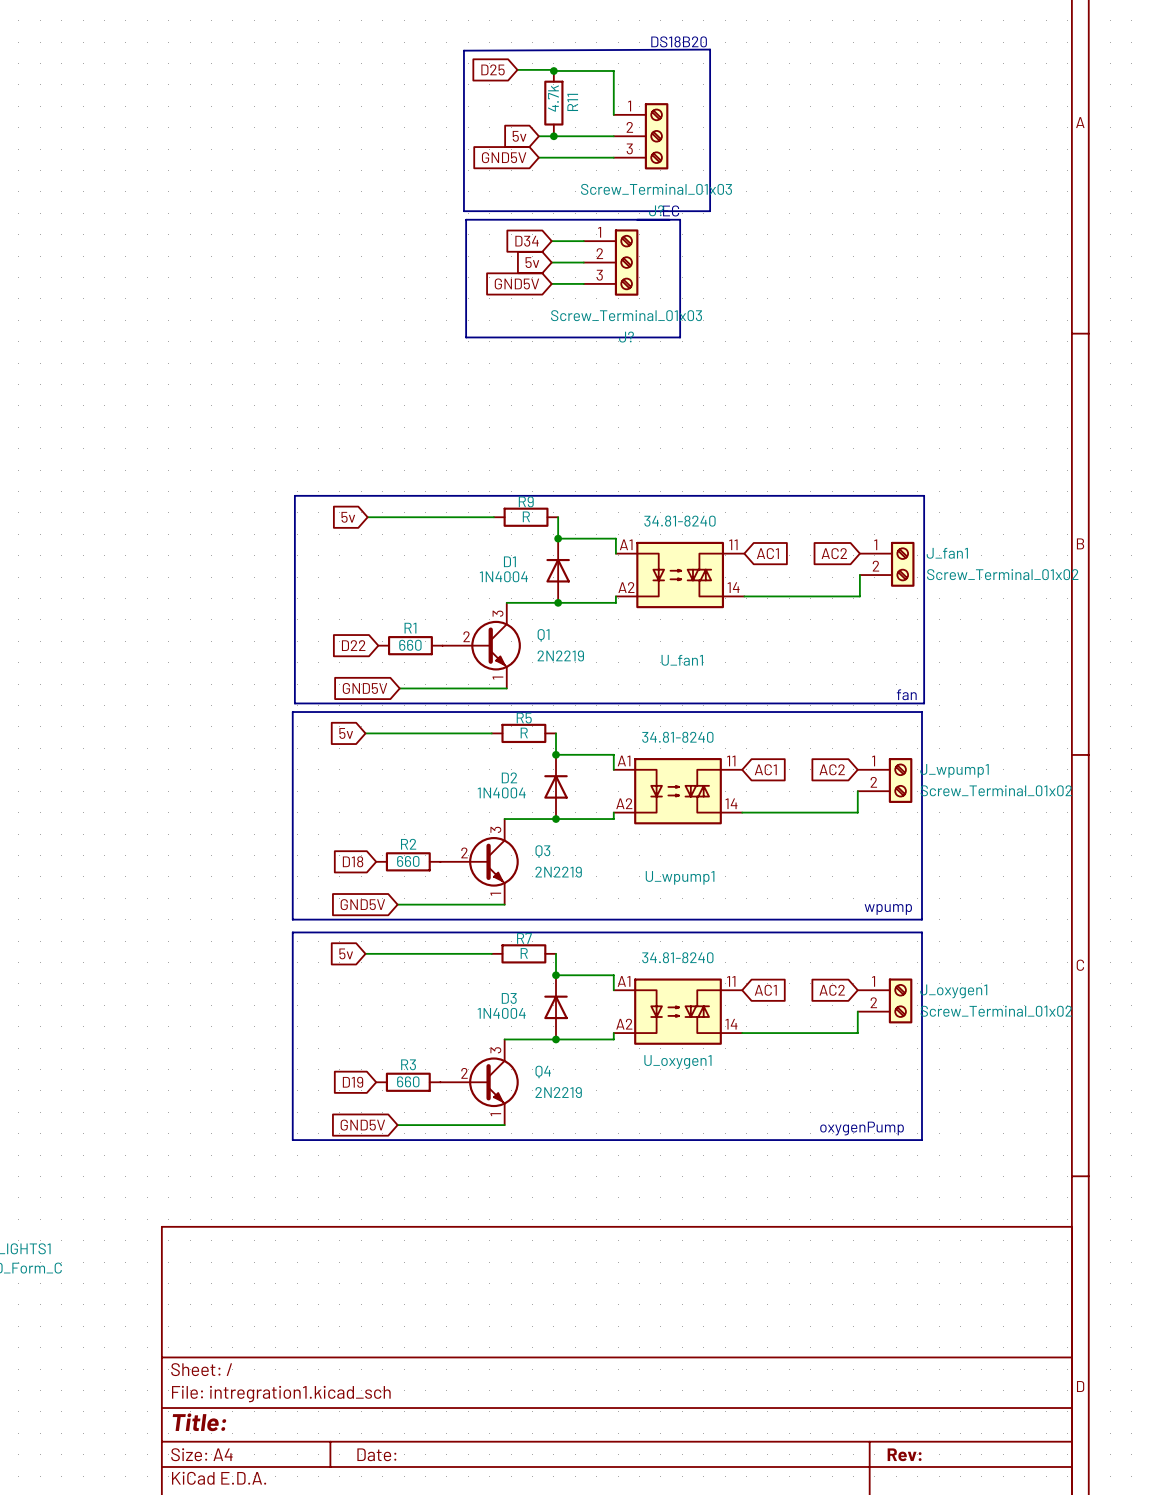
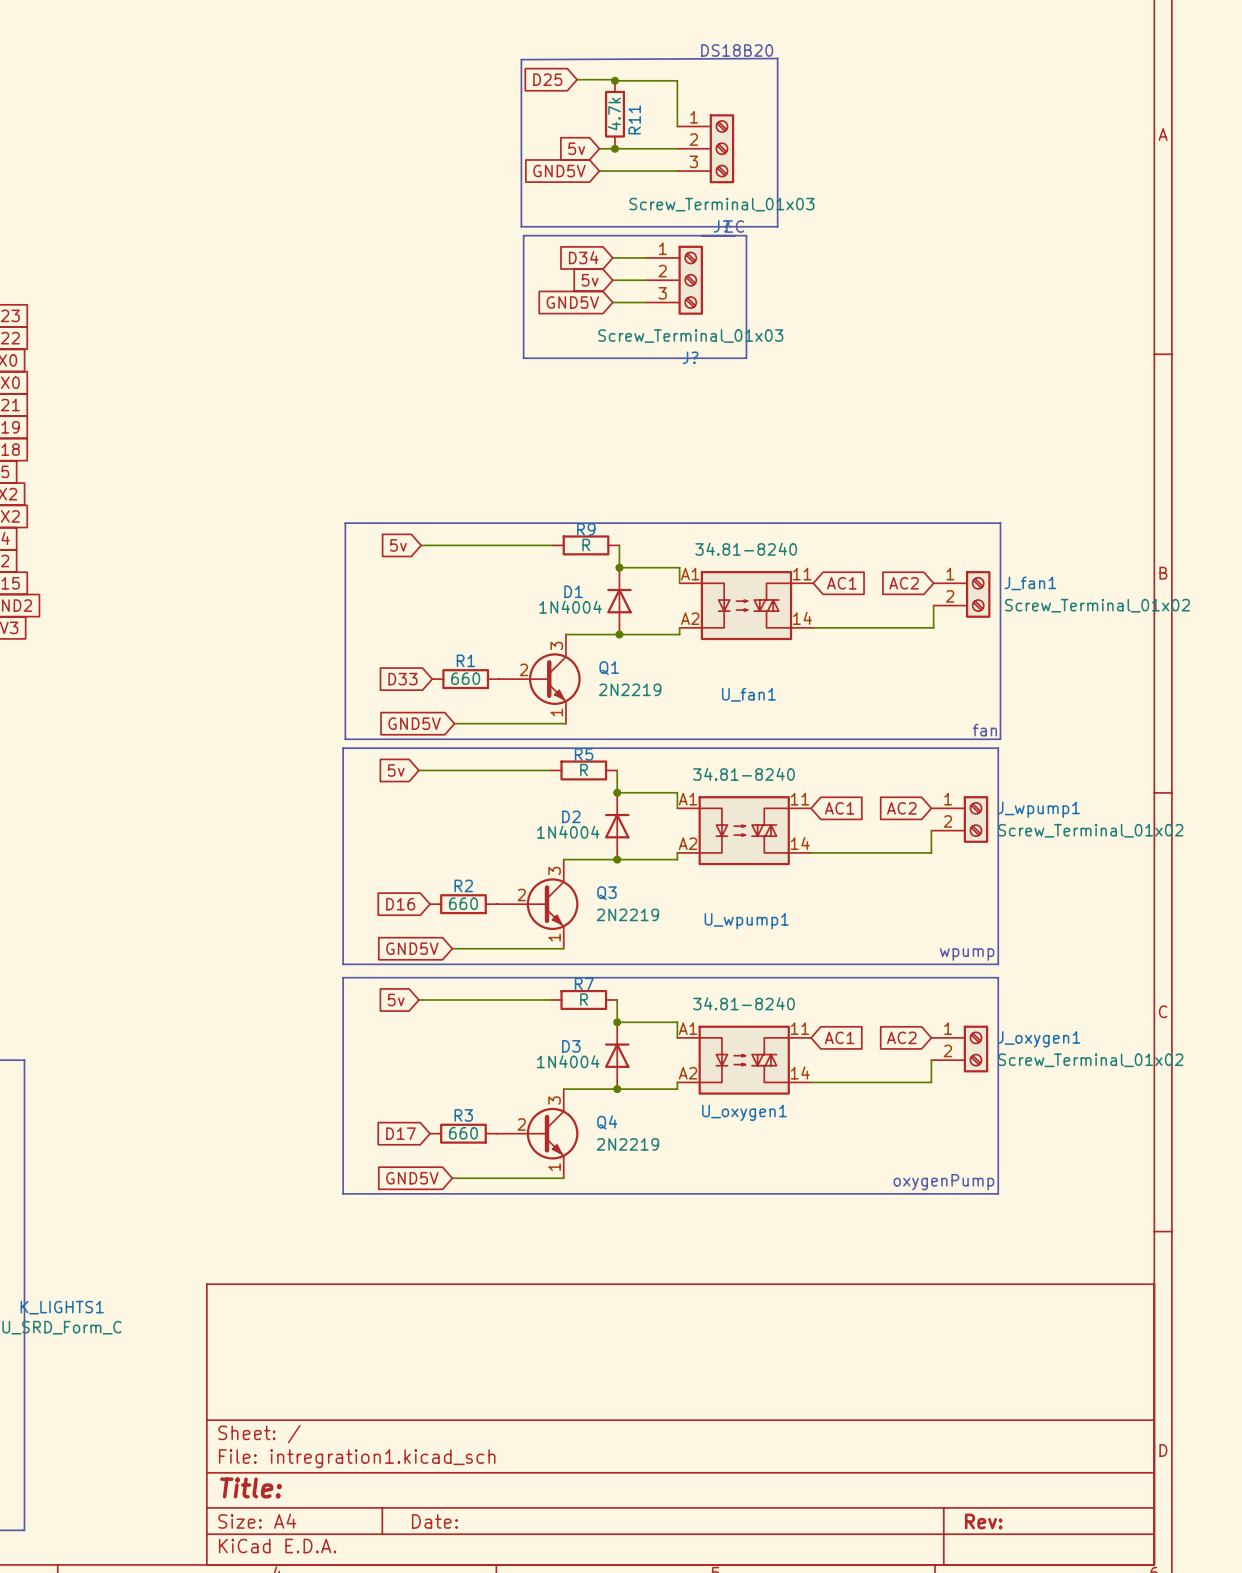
global label: D22 (353, 645) -> D33 (402, 679)
global label: D18 (353, 861) -> D16 (400, 904)
global label: D19 (353, 1082) -> D17 (400, 1133)

